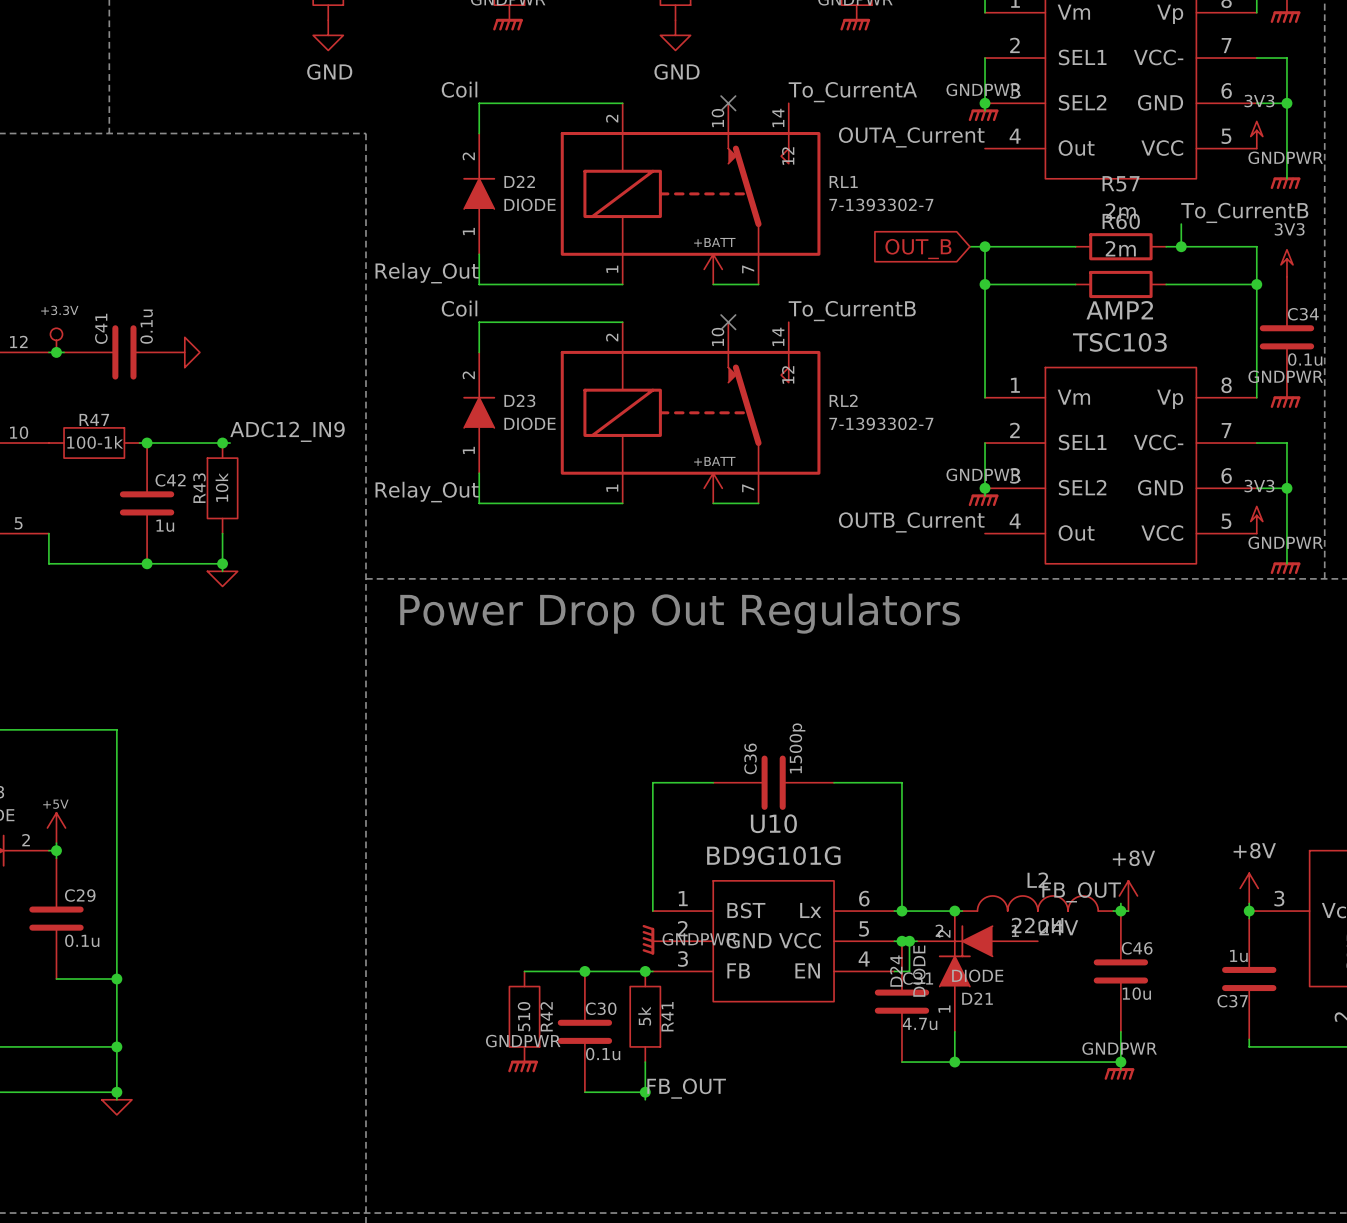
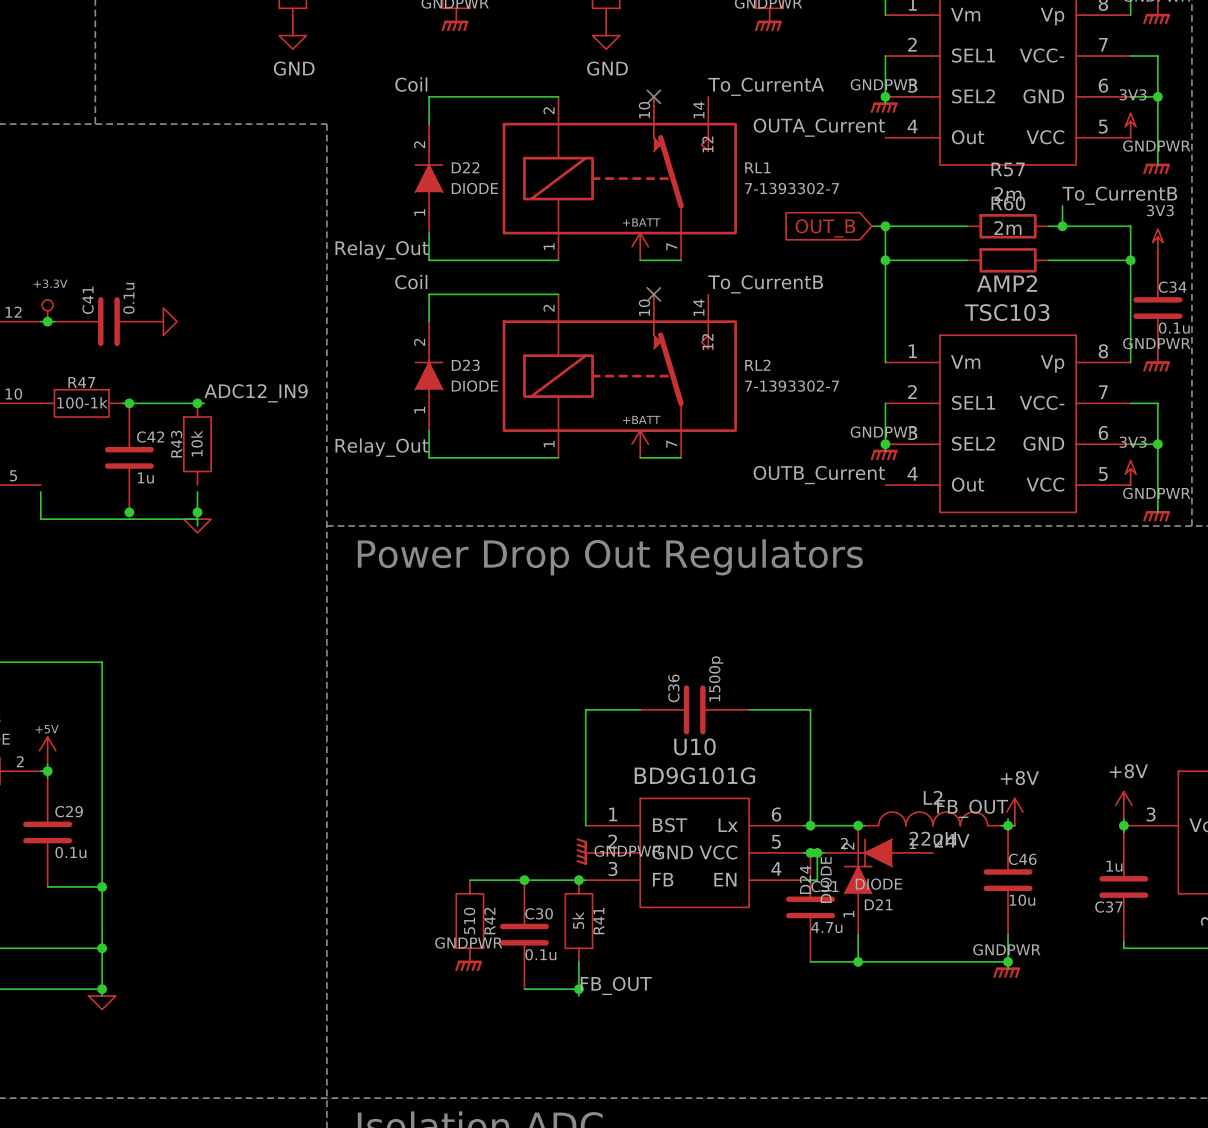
wire: (48, 533) (48, 541) -> none
wire: (222, 533) (222, 541) -> none
wire: (48, 563) (222, 563) -> (40, 512) (40, 519) (197, 519) (197, 525)

